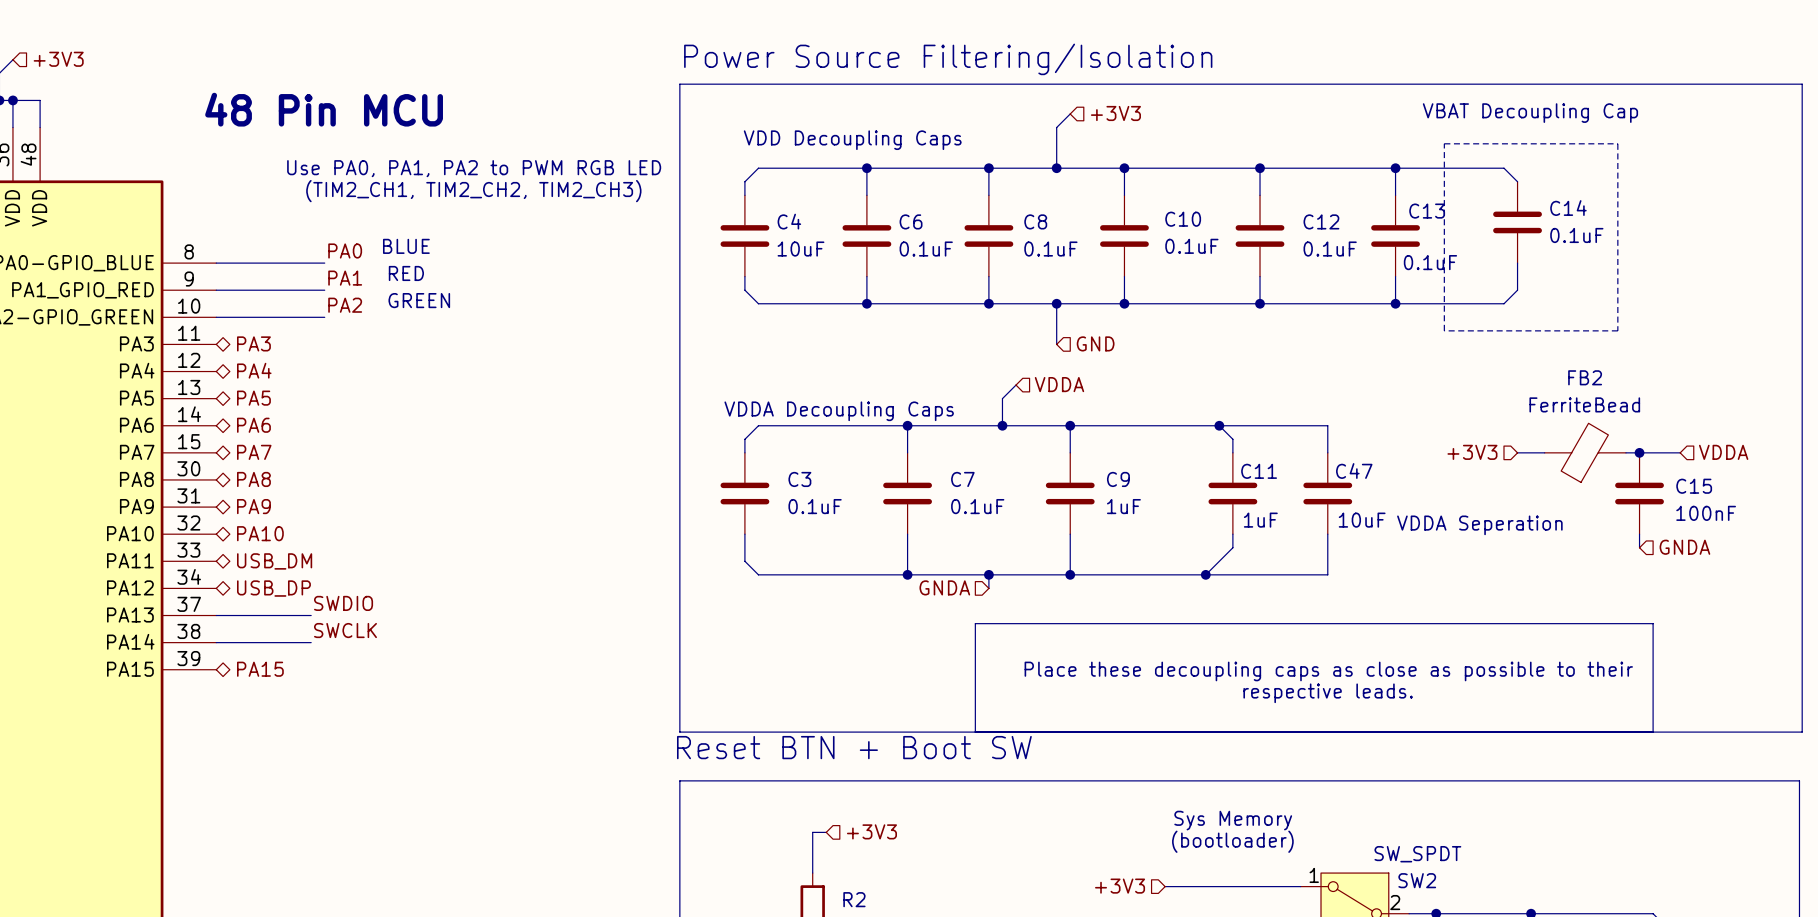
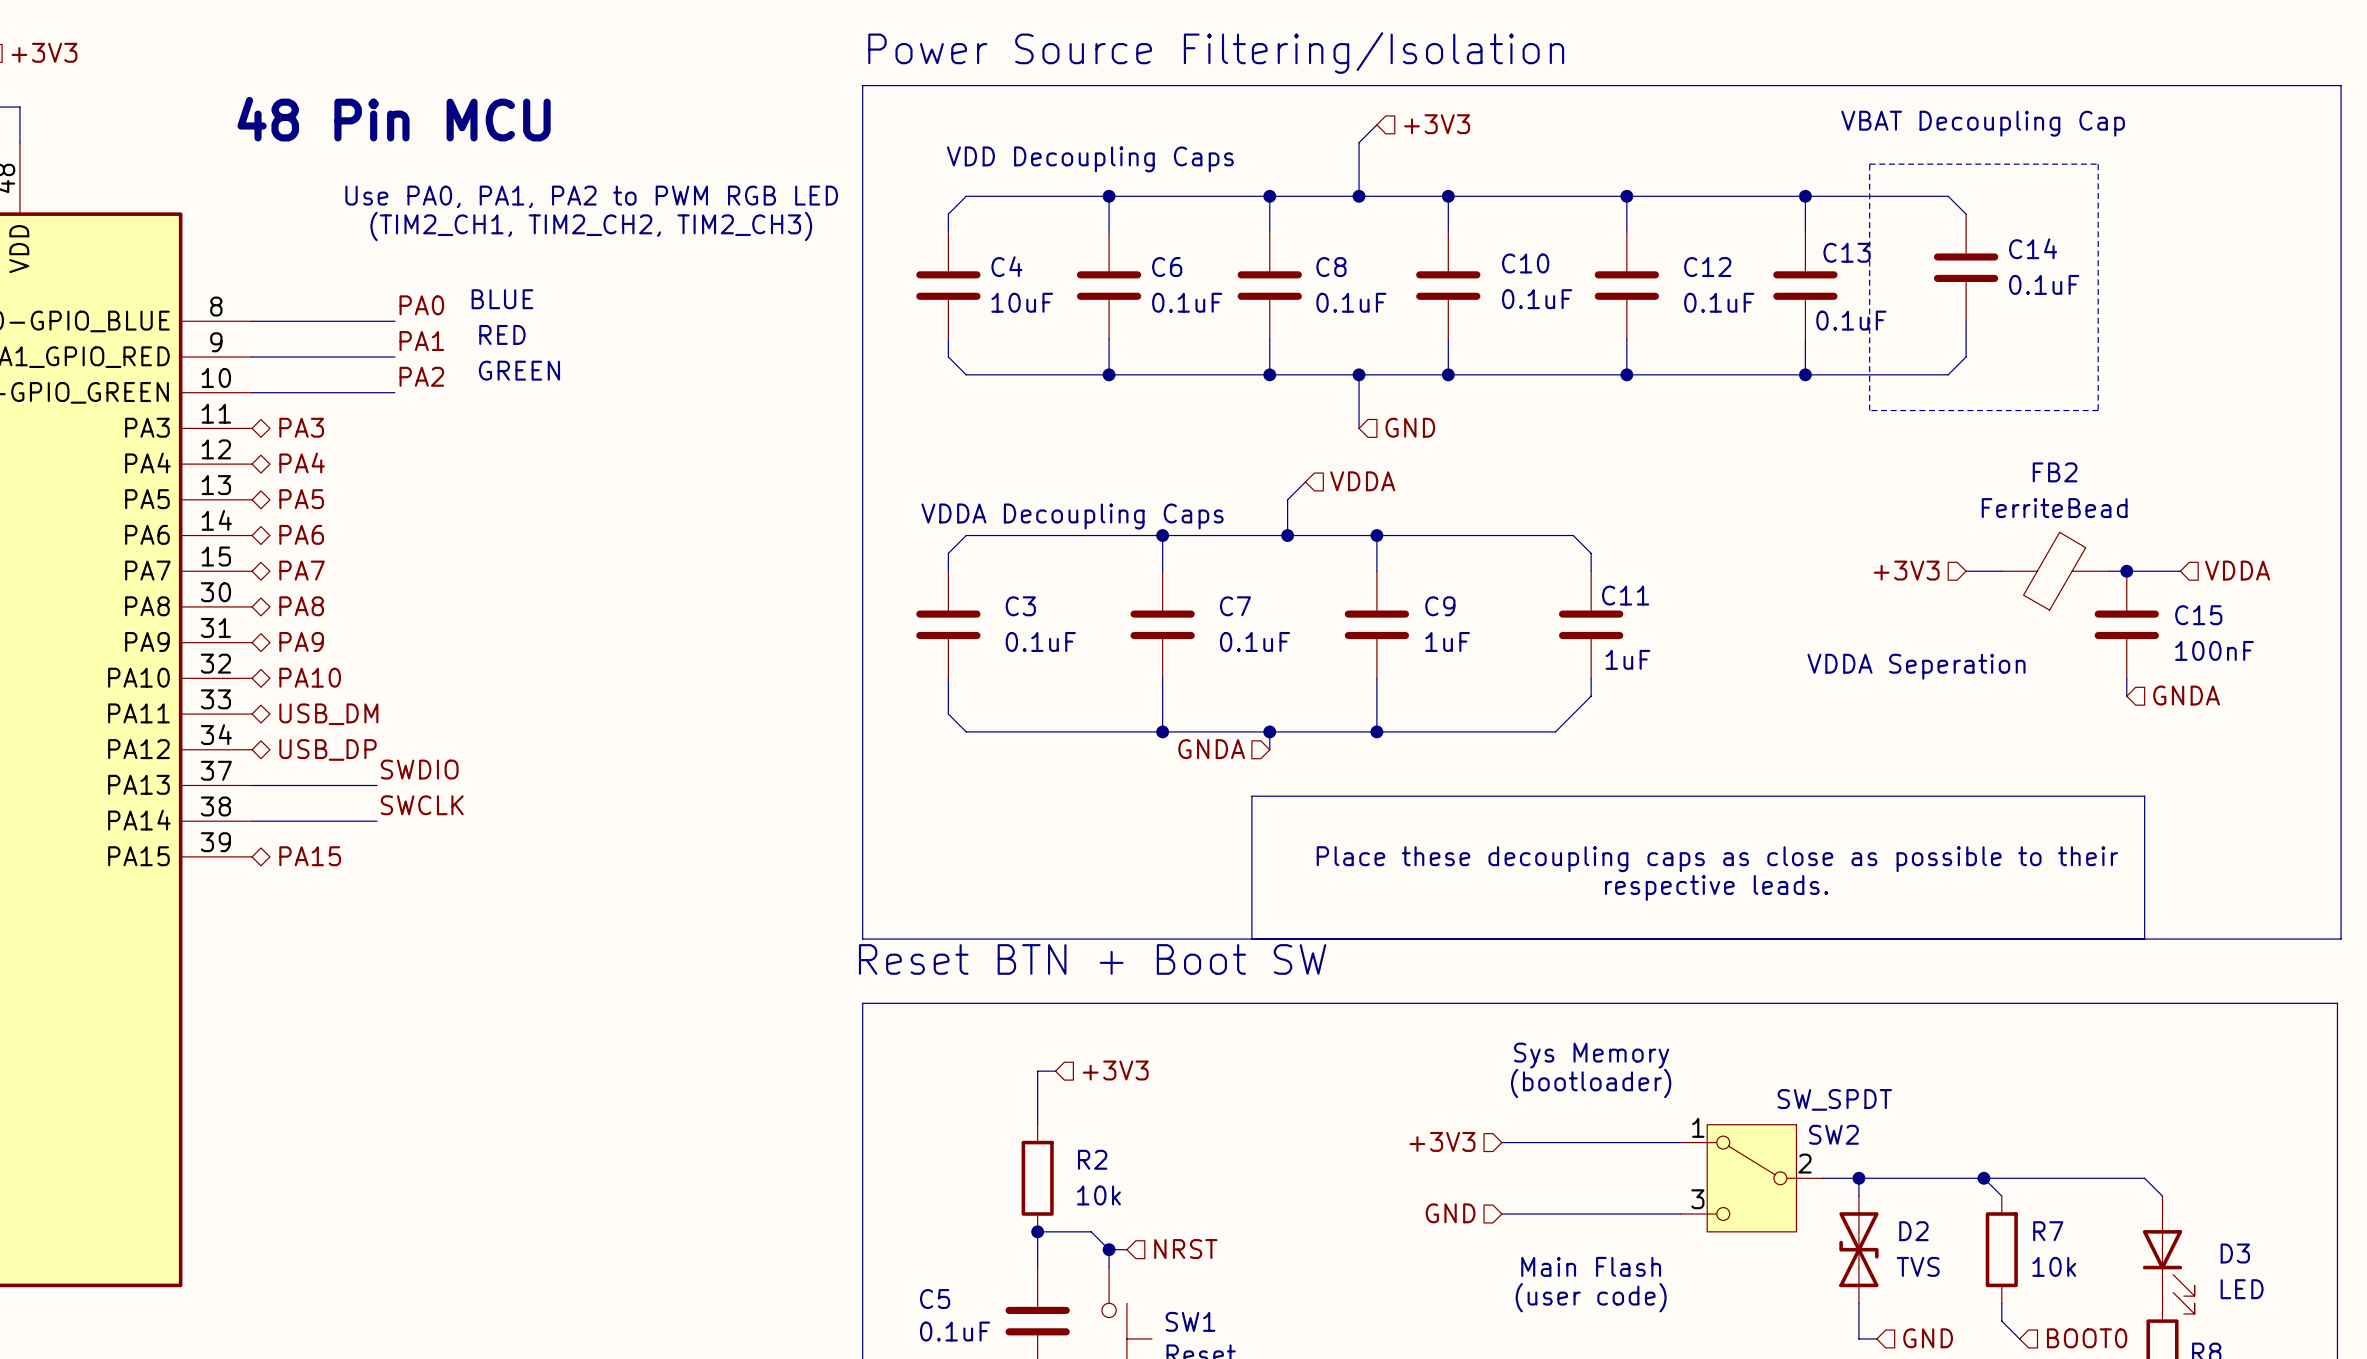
wire: (1219, 425) (1327, 425) (1327, 452) -> none
junction: (1219, 425) -> none
C47: 10uF (1327, 493) -> none
wire: (1327, 534) (1327, 574) (1205, 574) -> none
junction: (1205, 574) -> none

